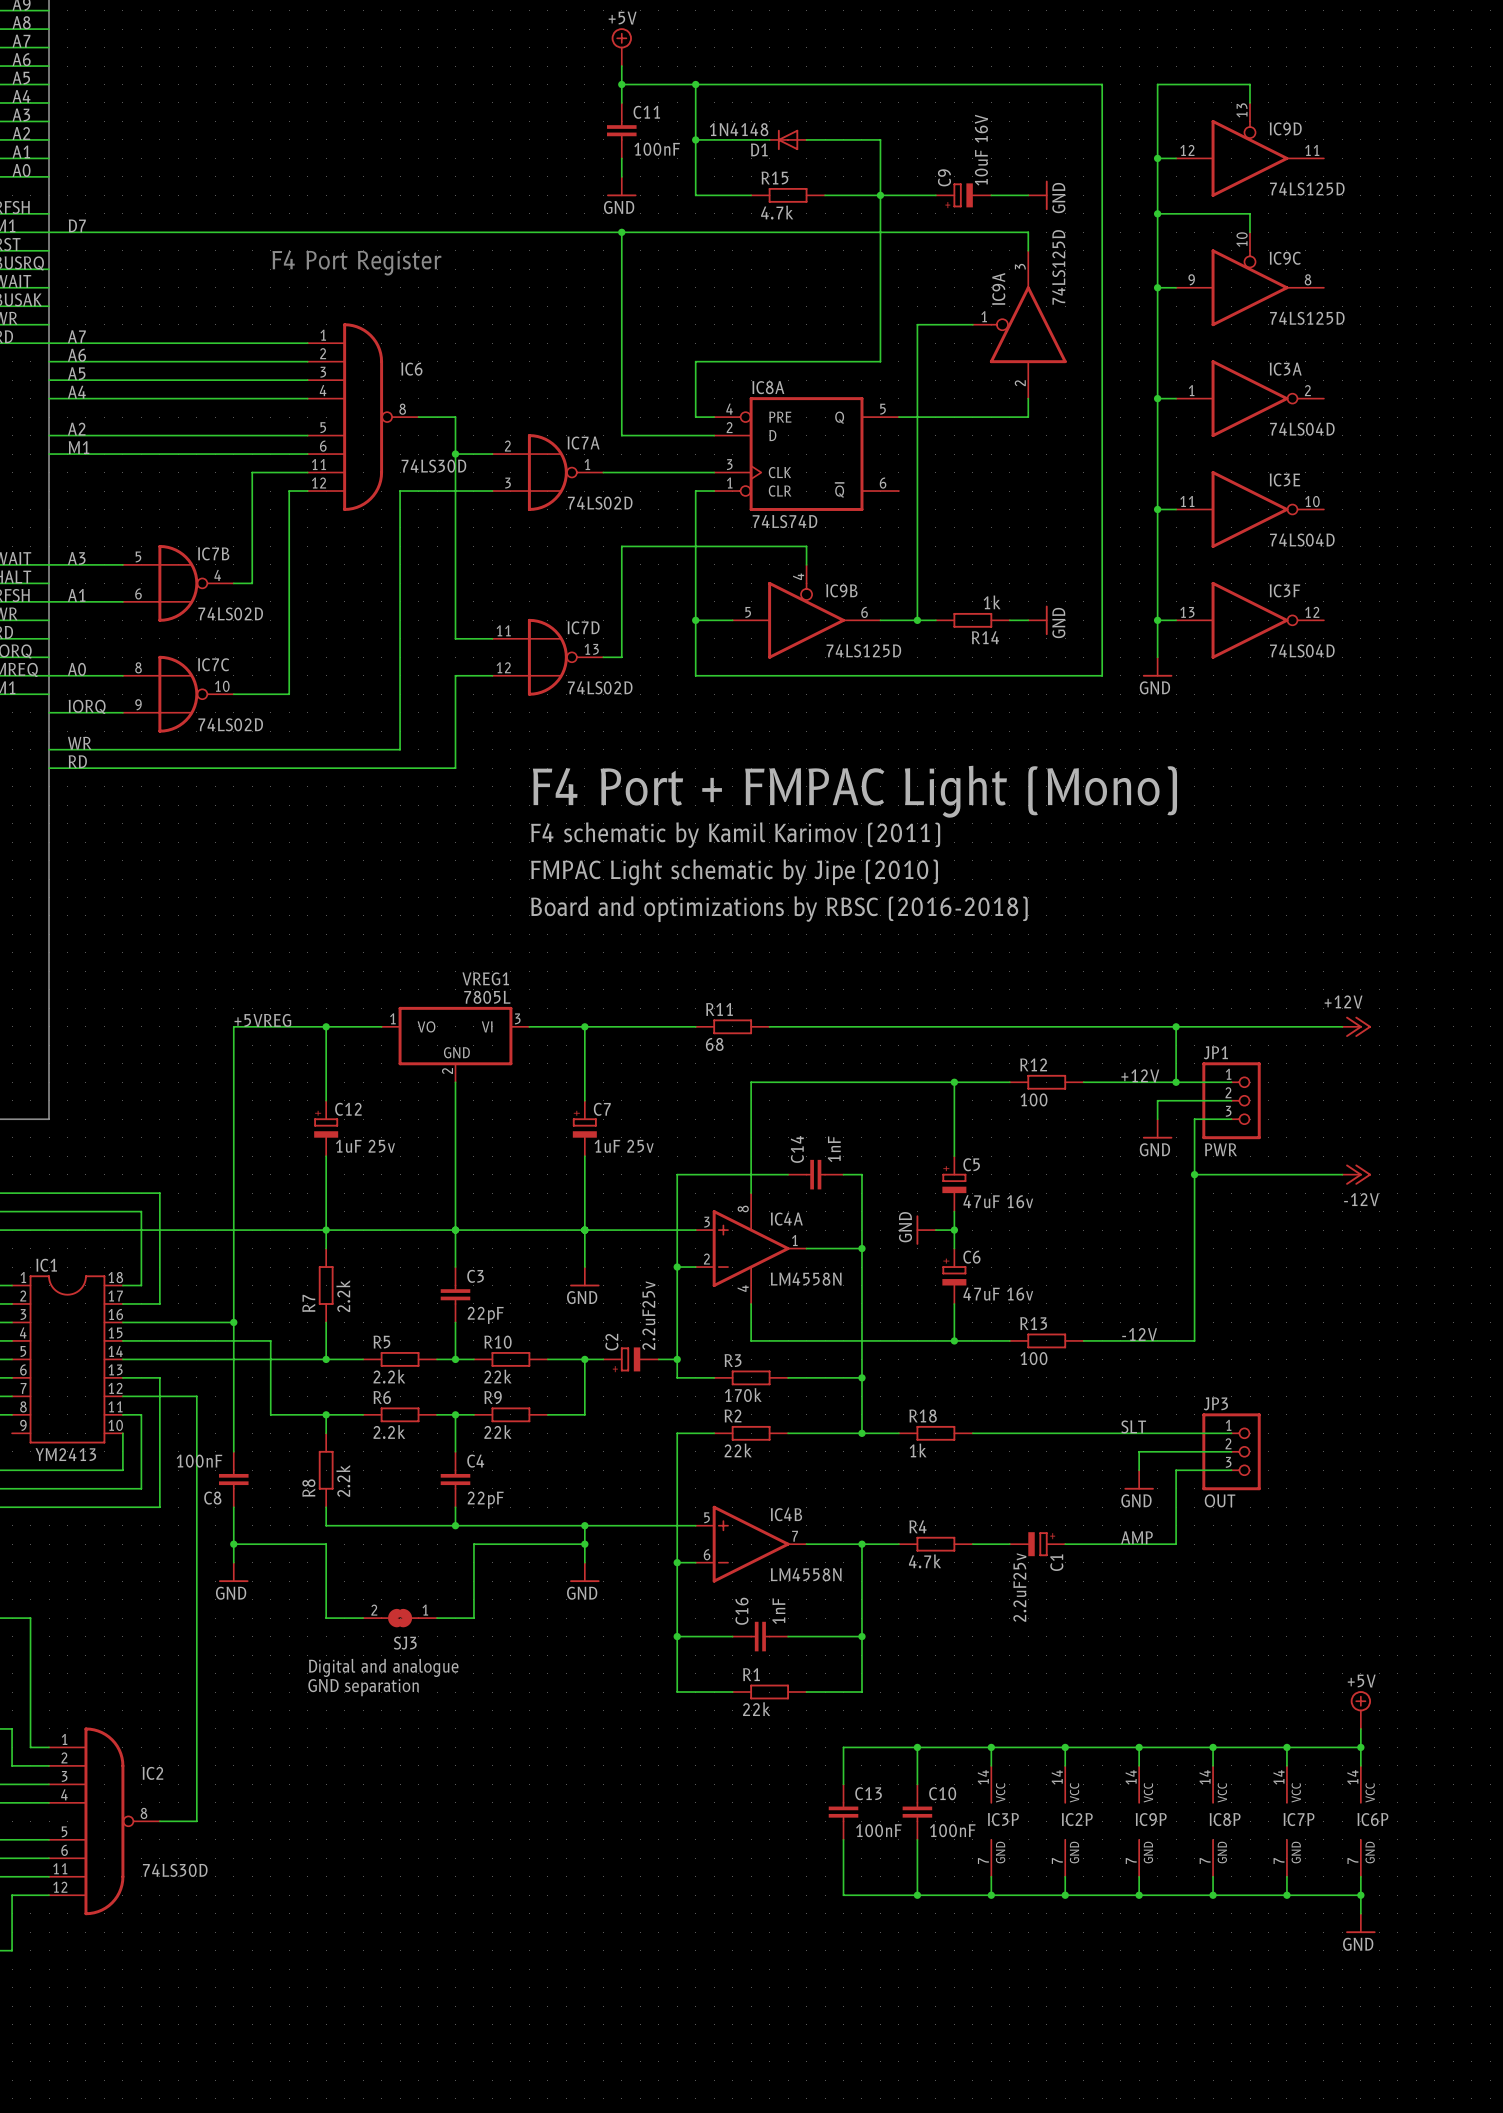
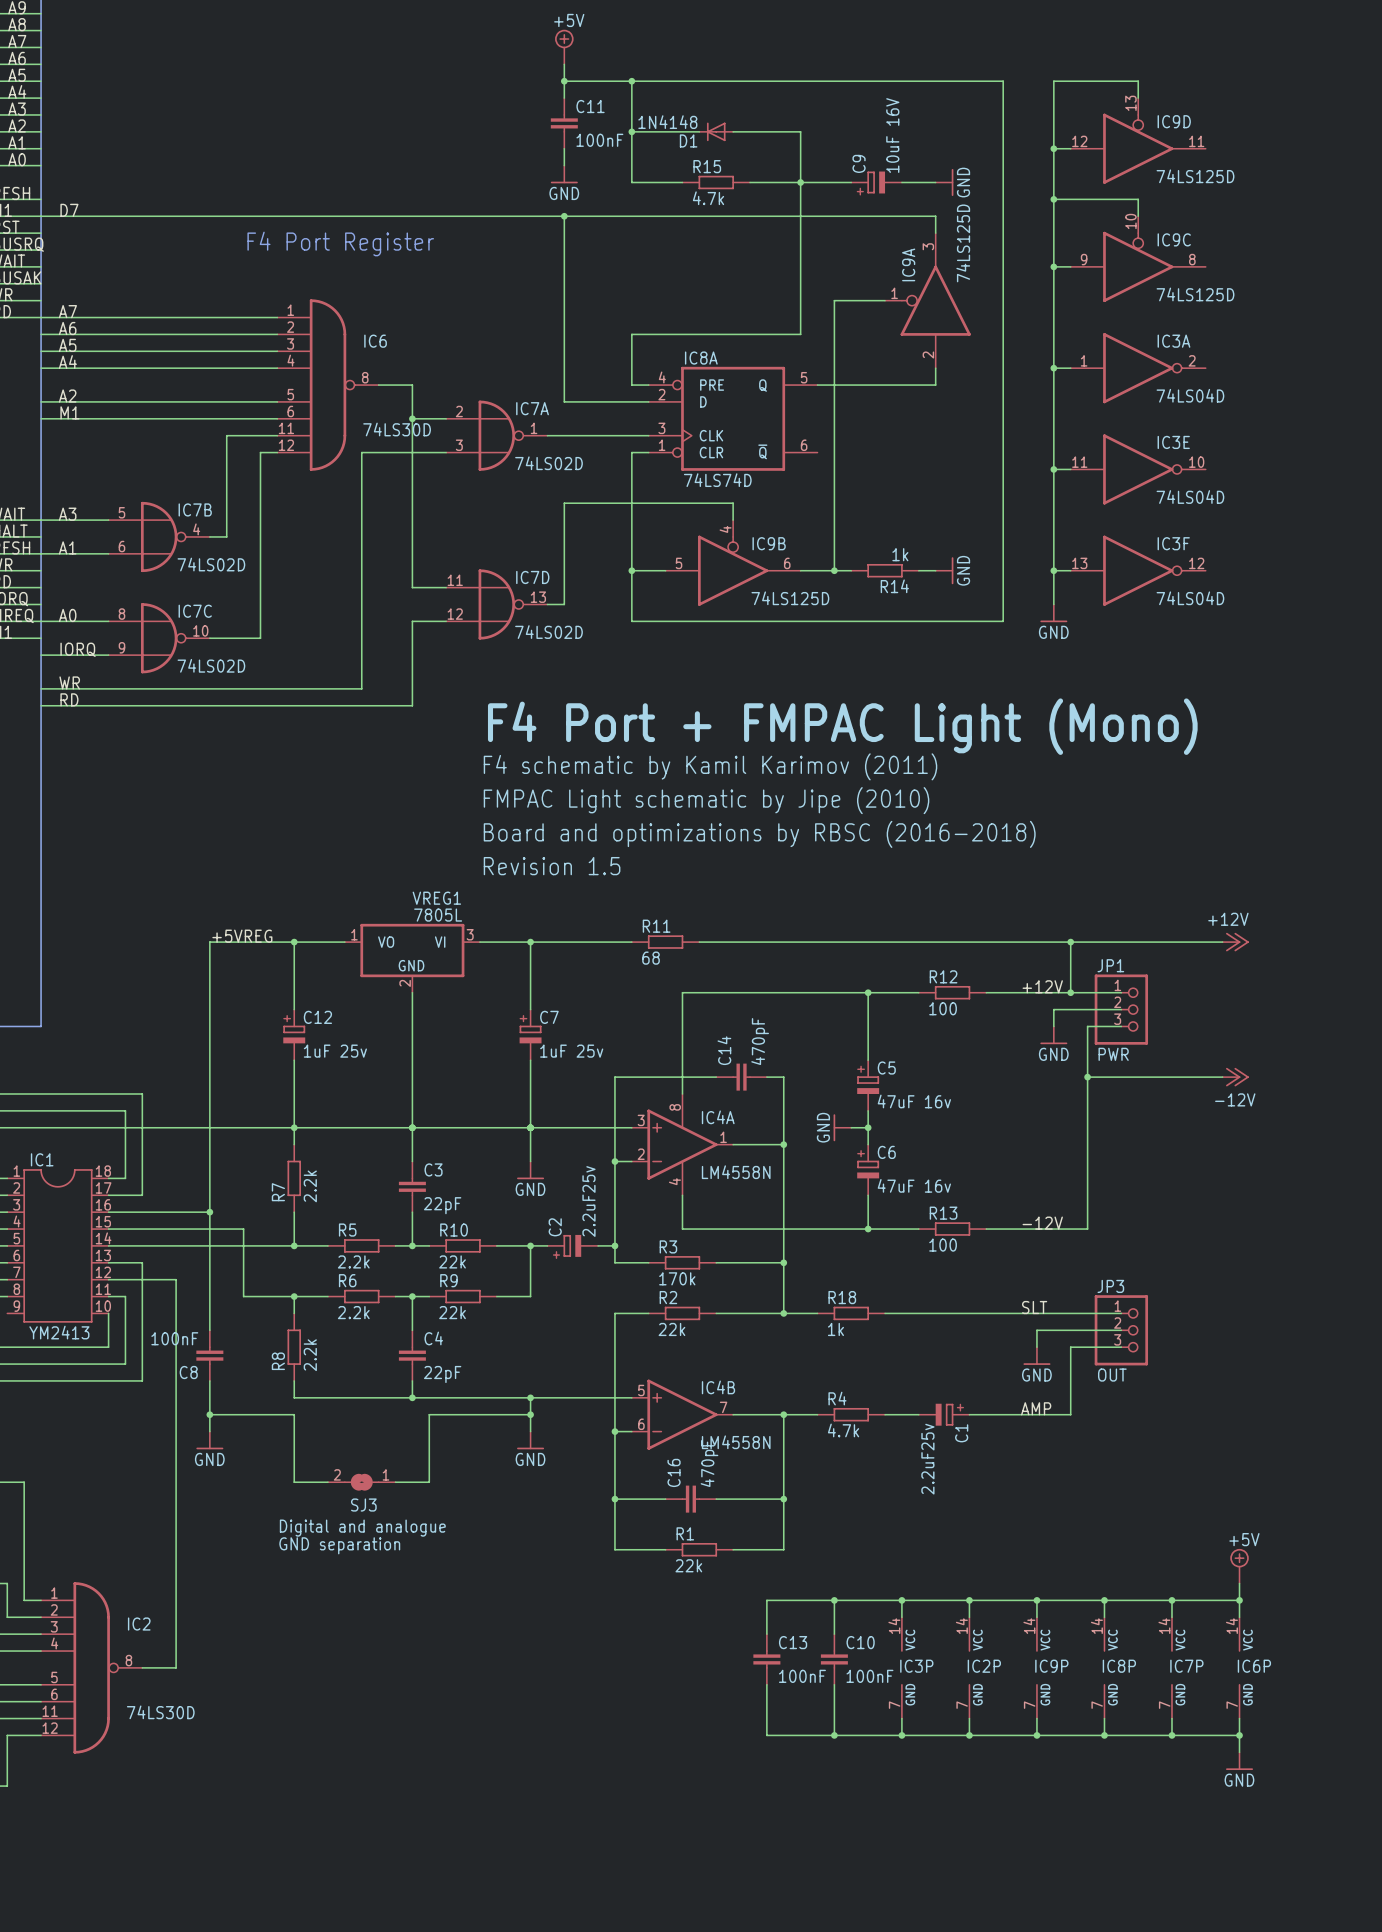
text: none -> Revision 1.5 (552, 866)
C14 value: 1nF (834, 1149) -> 470pF (760, 1041)
C16 value: 1nF (778, 1611) -> 470pF (709, 1463)

